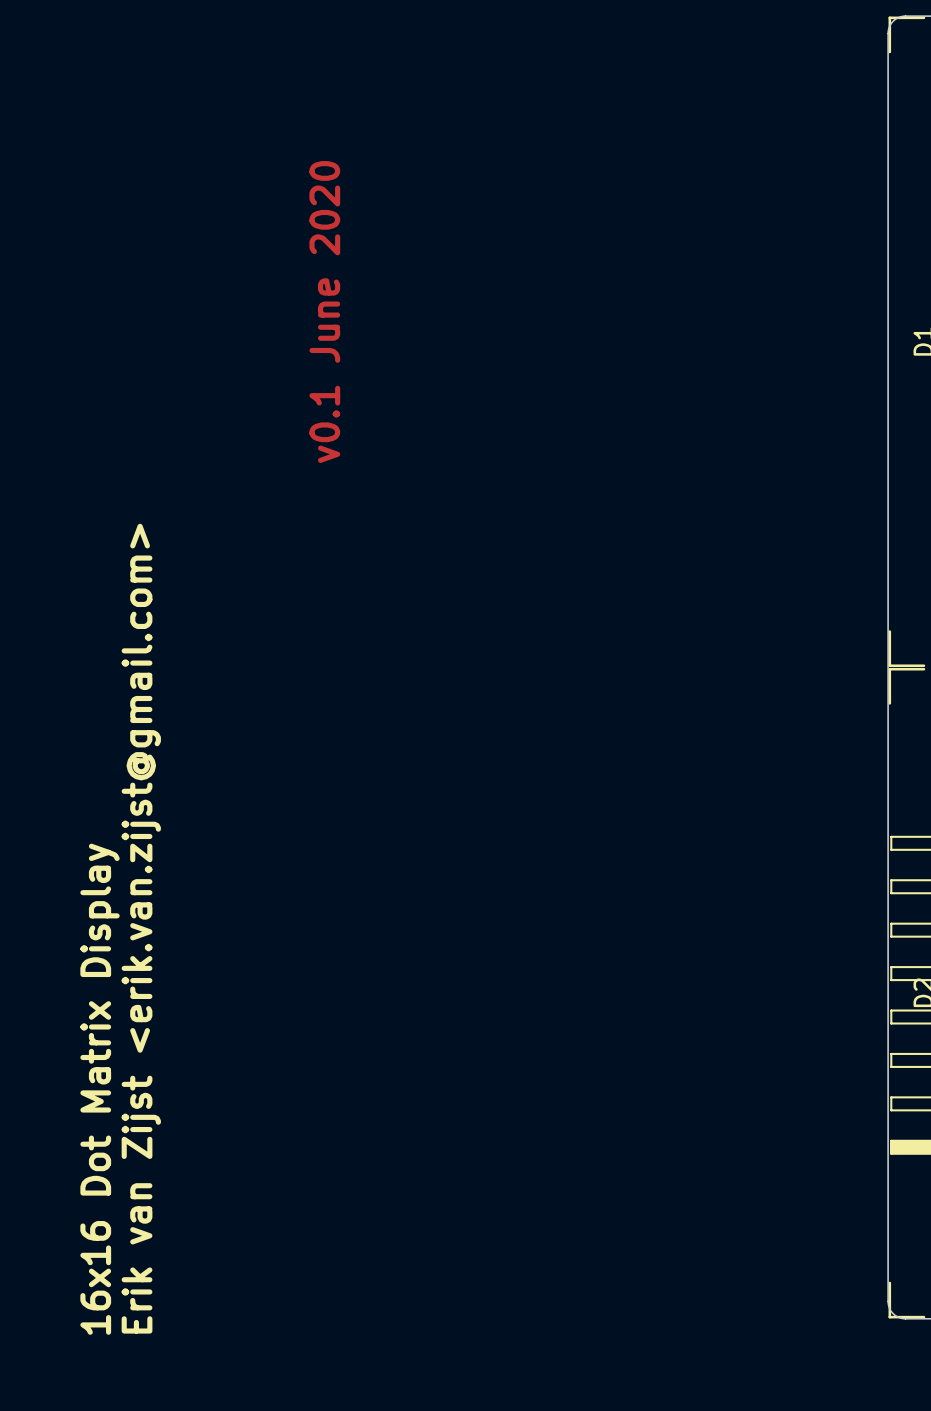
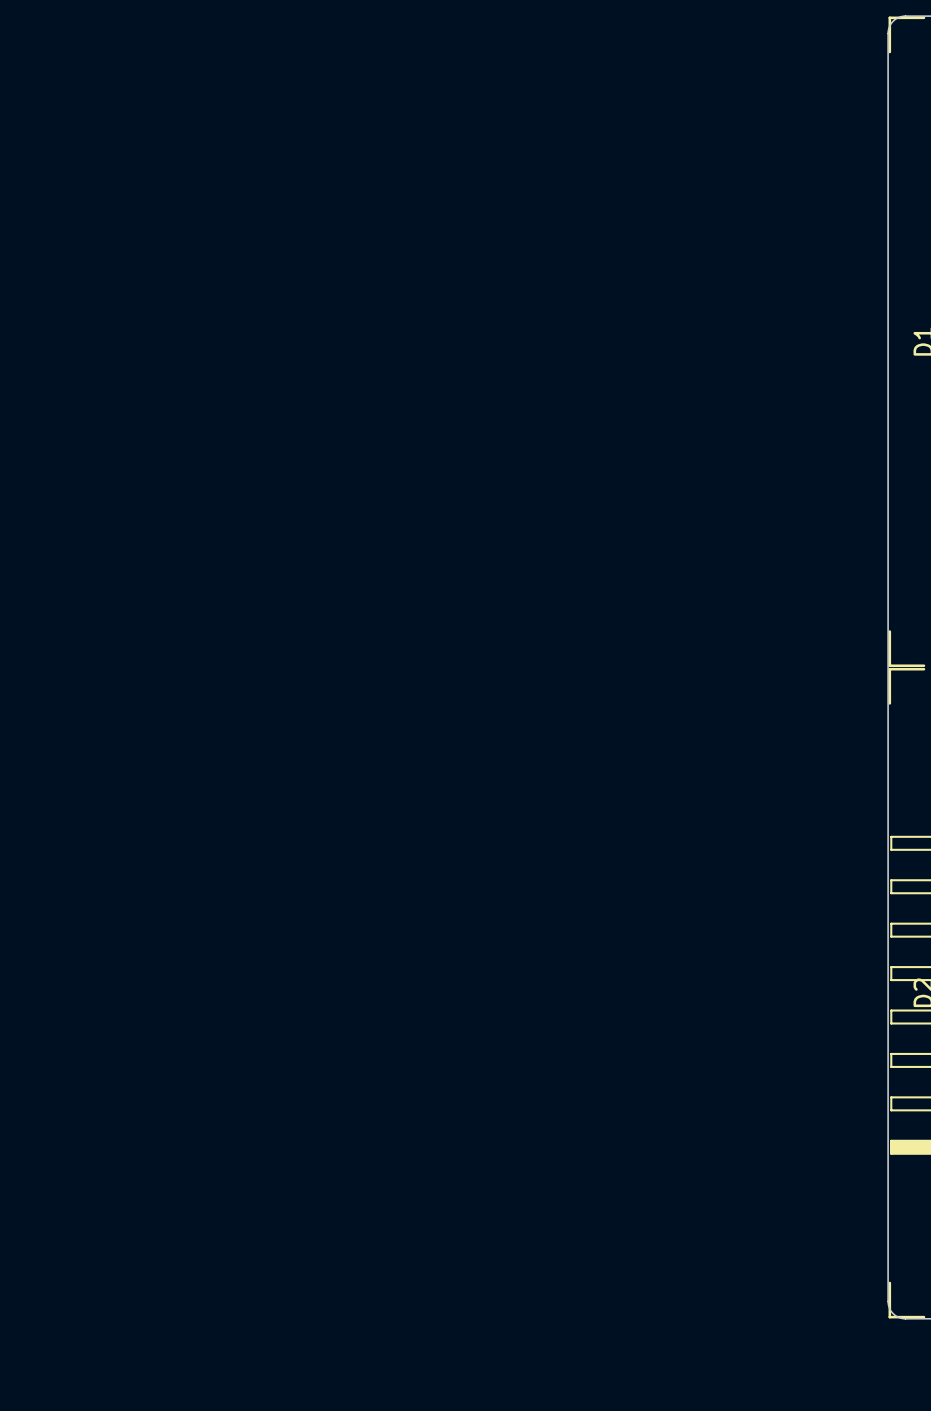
text: v0.1 June 2020 (324, 312) -> none
text: Erik van Zijst <erik.van.zijst@gmail.com> (141, 928) -> none
text: 16x16 Dot Matrix Display (100, 1089) -> none

